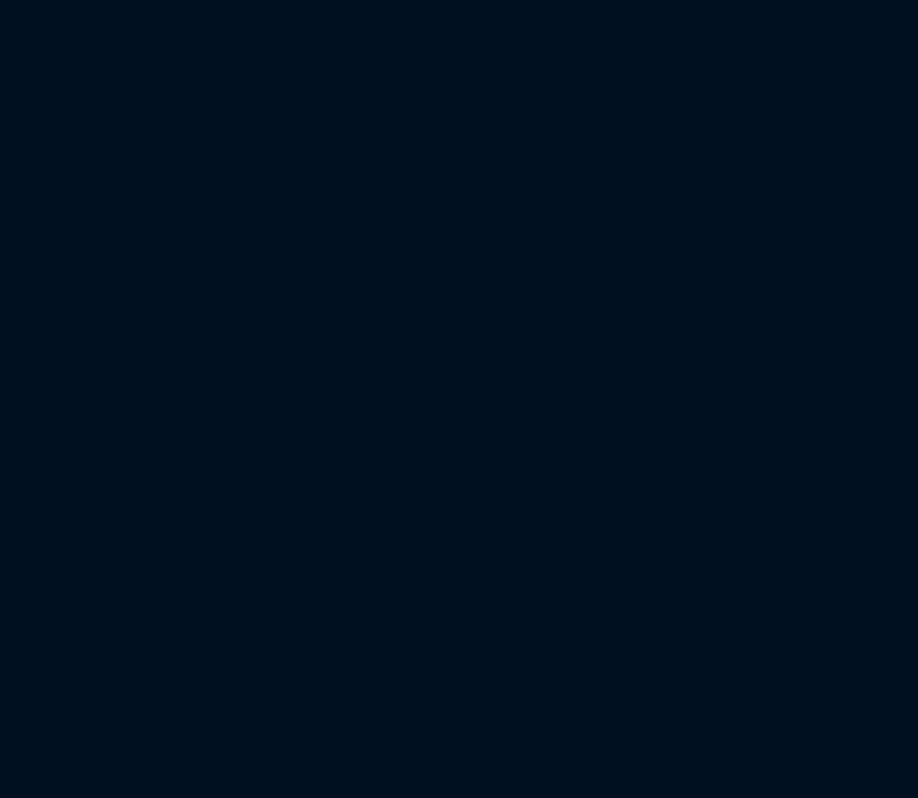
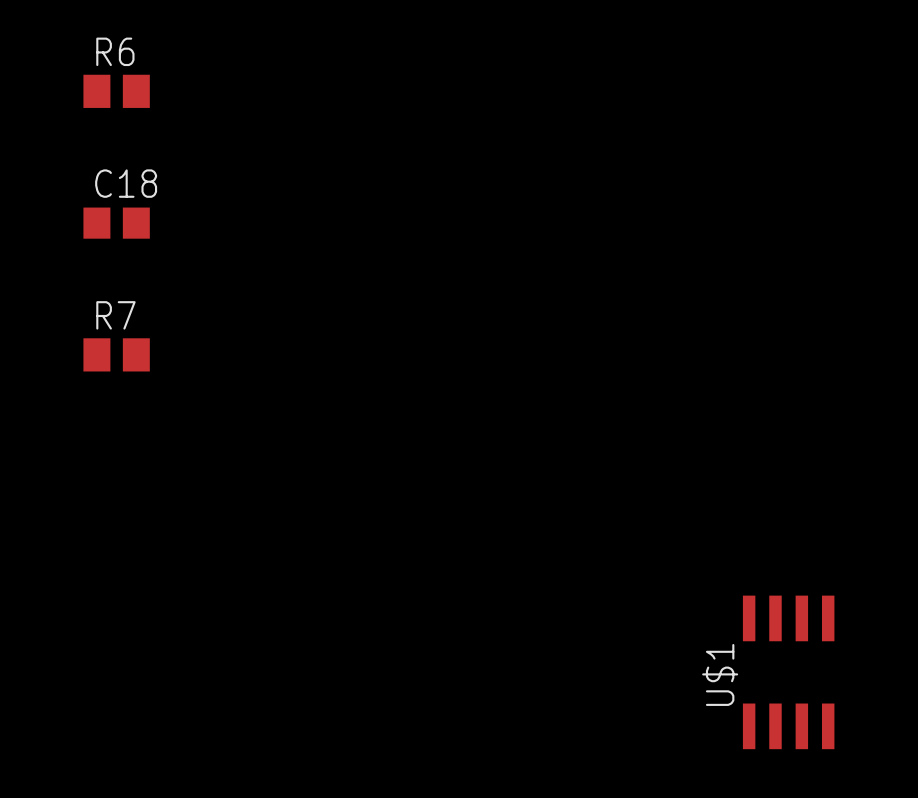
R6: none -> (116, 91)
C18: none -> (116, 223)
R7: none -> (116, 354)
U$1: none -> (788, 672)

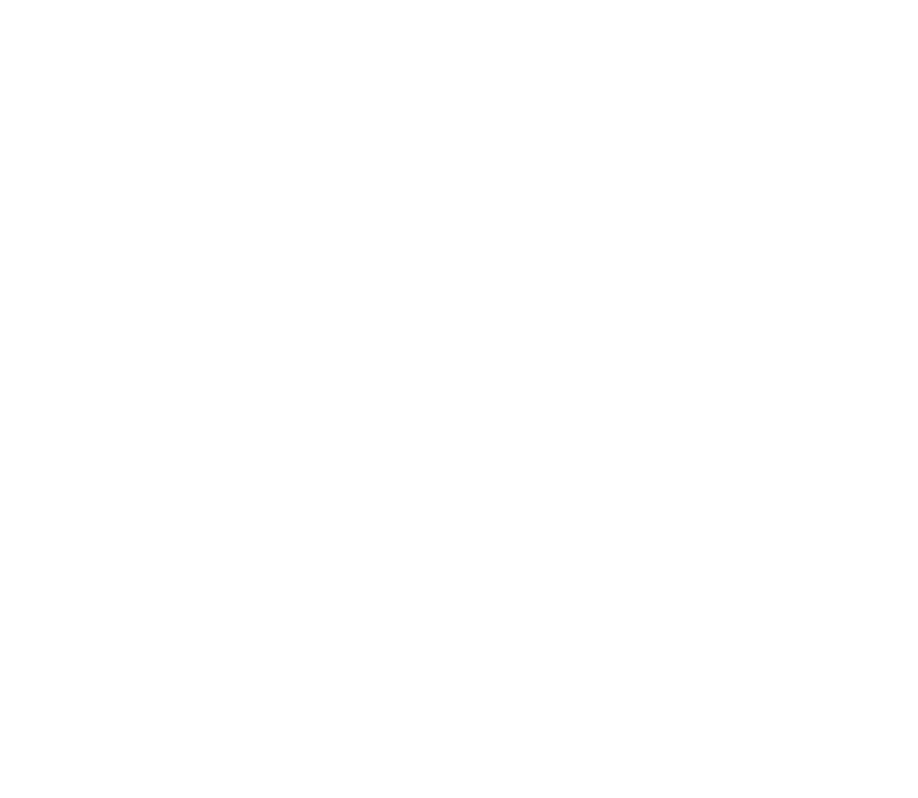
R6: (116, 91) -> none
C18: (116, 223) -> none
R7: (116, 354) -> none
U$1: (788, 672) -> none

